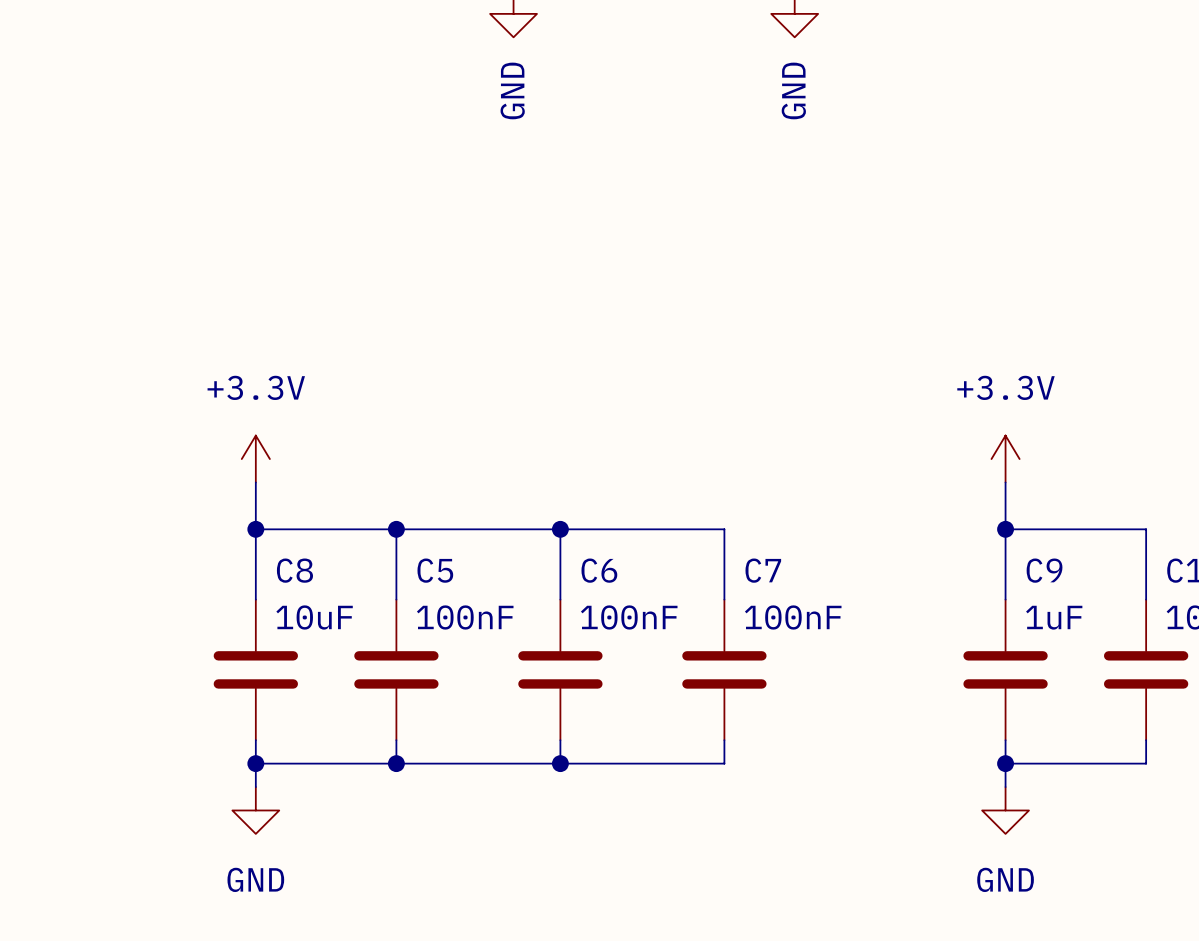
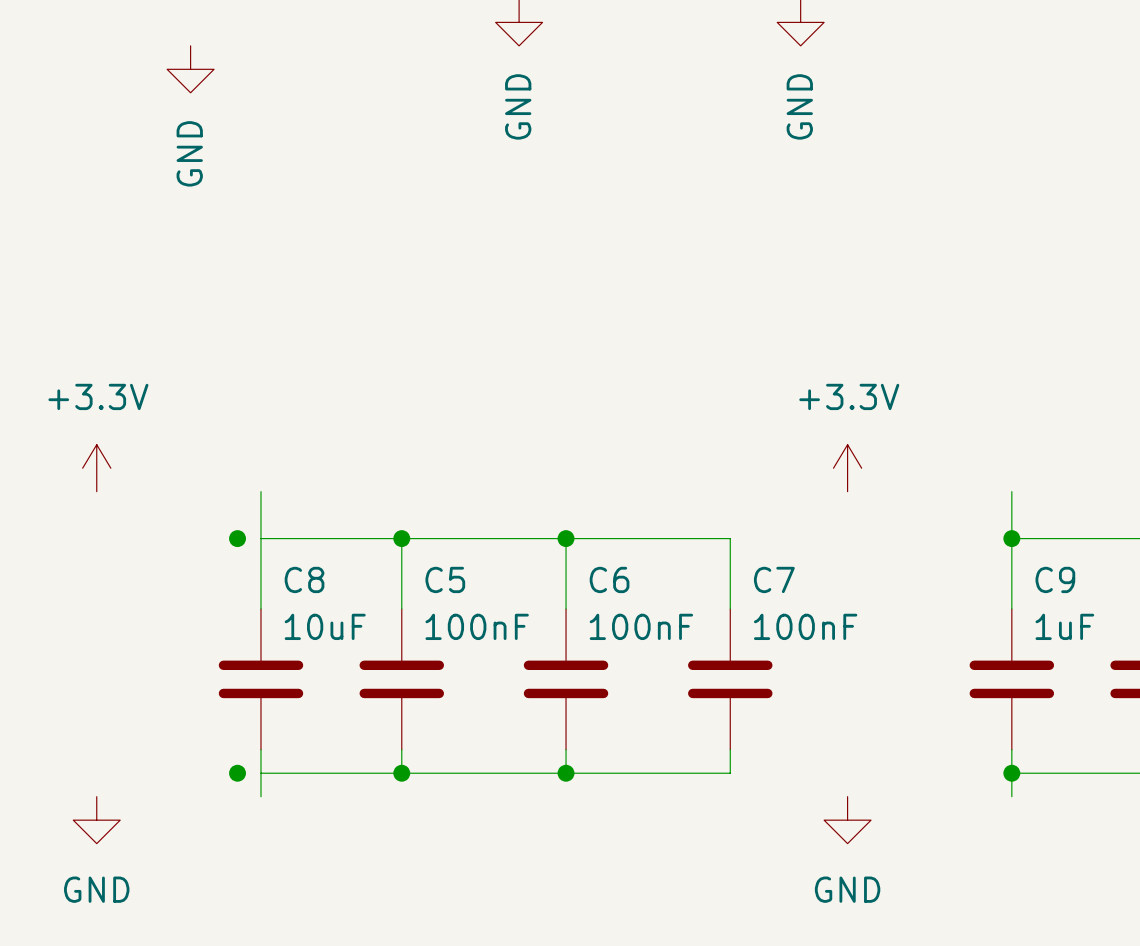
power symbol: none -> GND (190, 69)
power symbol position: +3.3V (255, 459) -> +3.3V (96, 468)
power symbol position: +3.3V (1005, 459) -> +3.3V (847, 468)
junction position: (255, 529) -> (237, 538)
junction position: (255, 763) -> (237, 773)
power symbol position: GND (255, 810) -> GND (96, 820)
power symbol position: GND (1005, 810) -> GND (847, 820)

